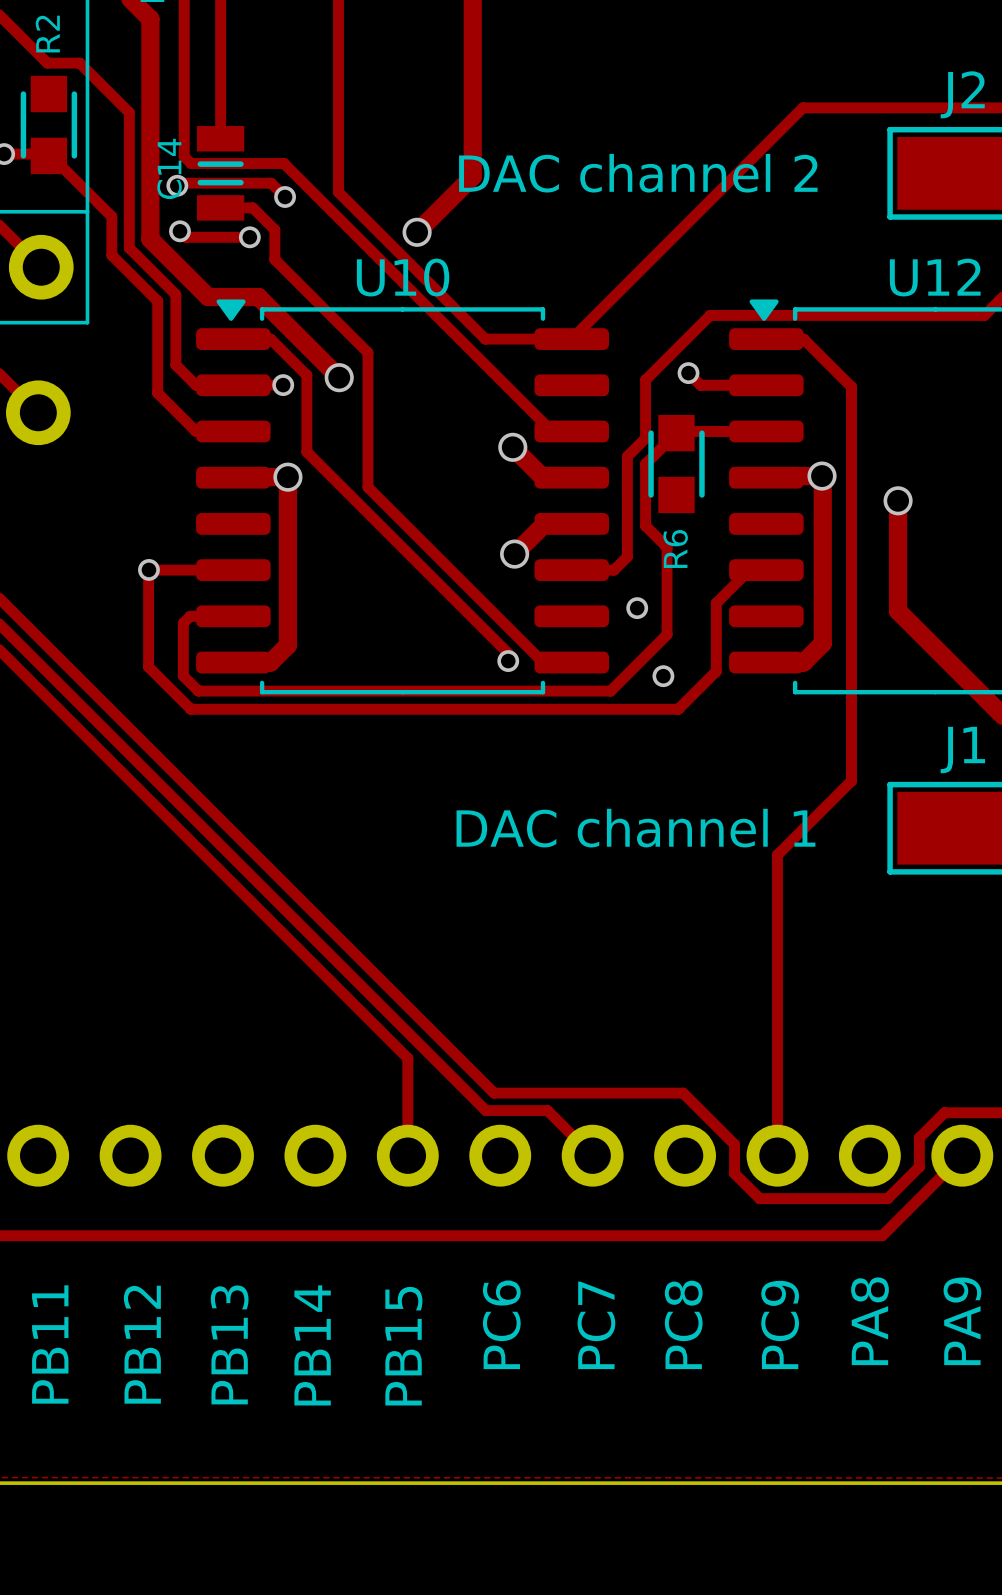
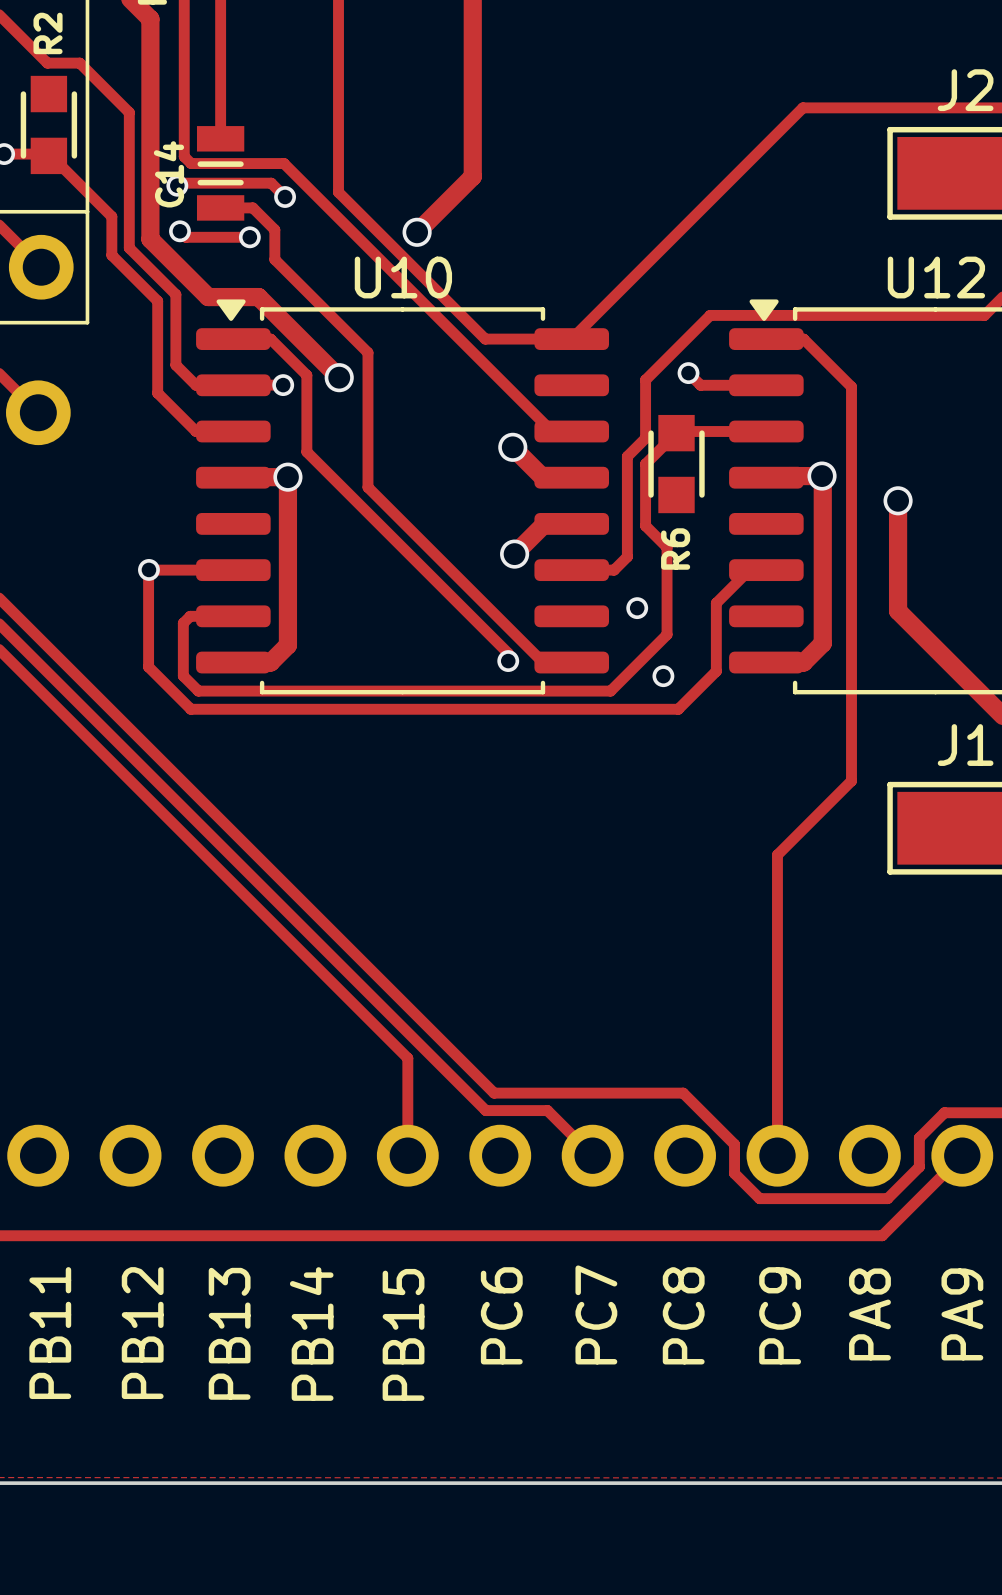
text: DAC channel 2 (638, 173) -> none
text: DAC channel 1 (635, 828) -> none

